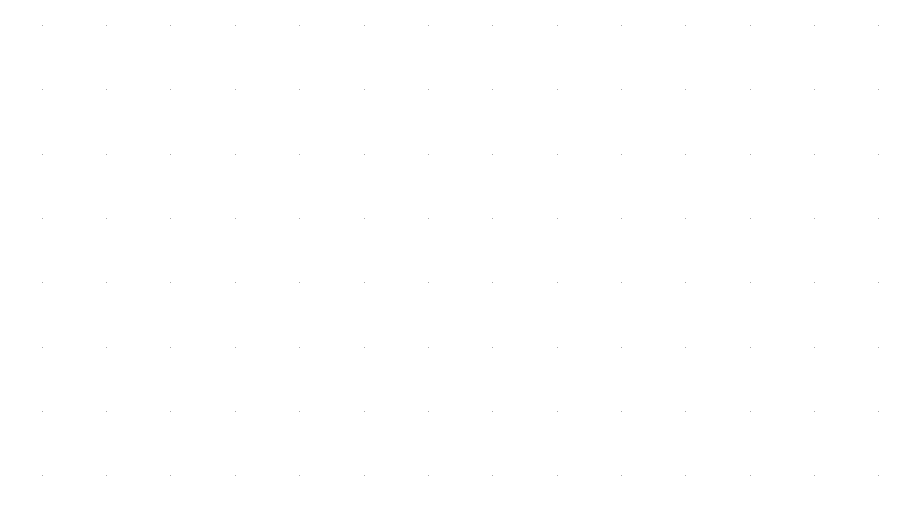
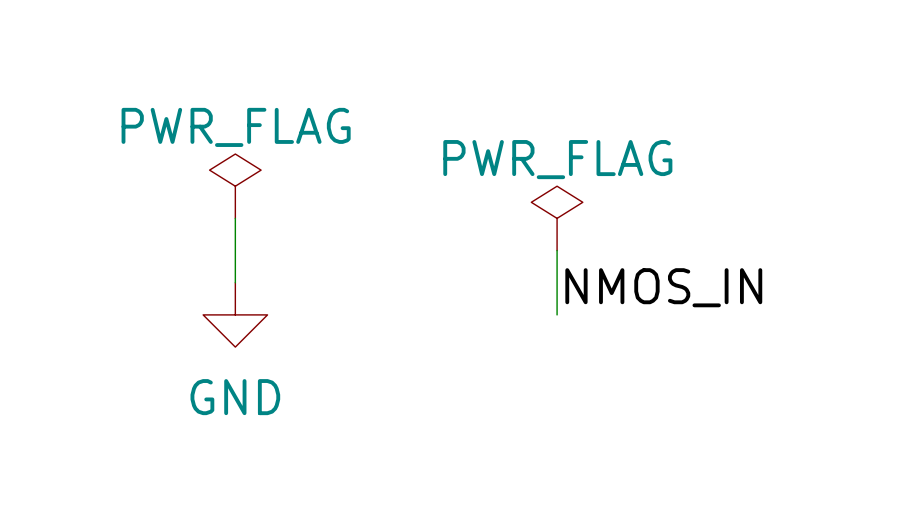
power symbol: none -> PWR_FLAG (235, 186)
wire: none -> (235, 218) (235, 282)
power symbol: none -> PWR_FLAG (557, 218)
wire: none -> (557, 250) (557, 314)
label: none -> NMOS_IN (663, 287)
power symbol: none -> GND (235, 314)

